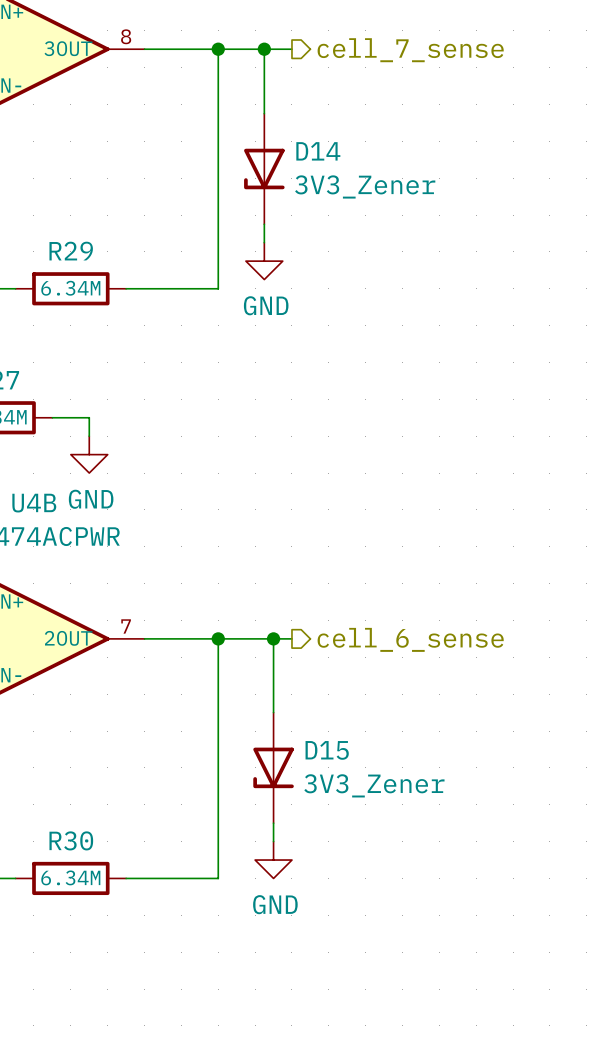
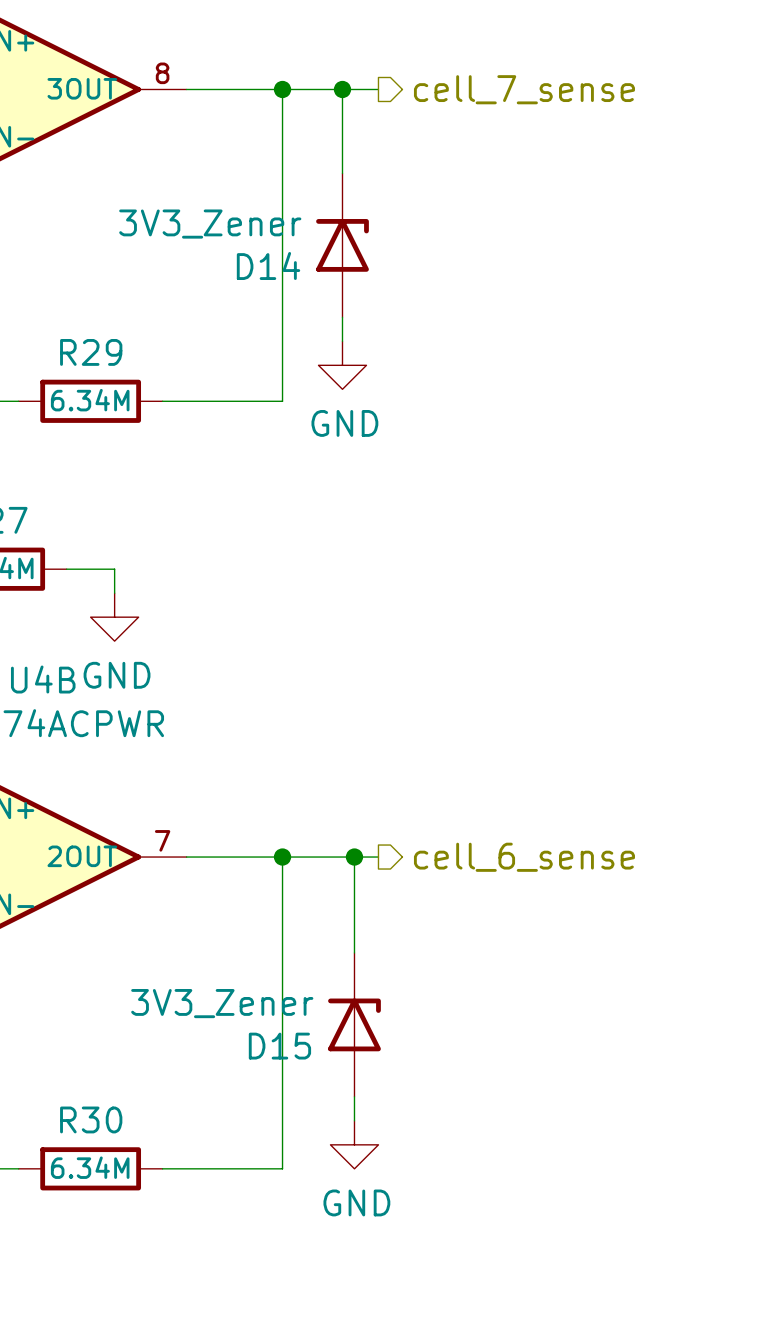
D14 rotation: 0° (264, 168) -> 180° (342, 245)
D15 rotation: 0° (273, 767) -> 180° (354, 1024)

